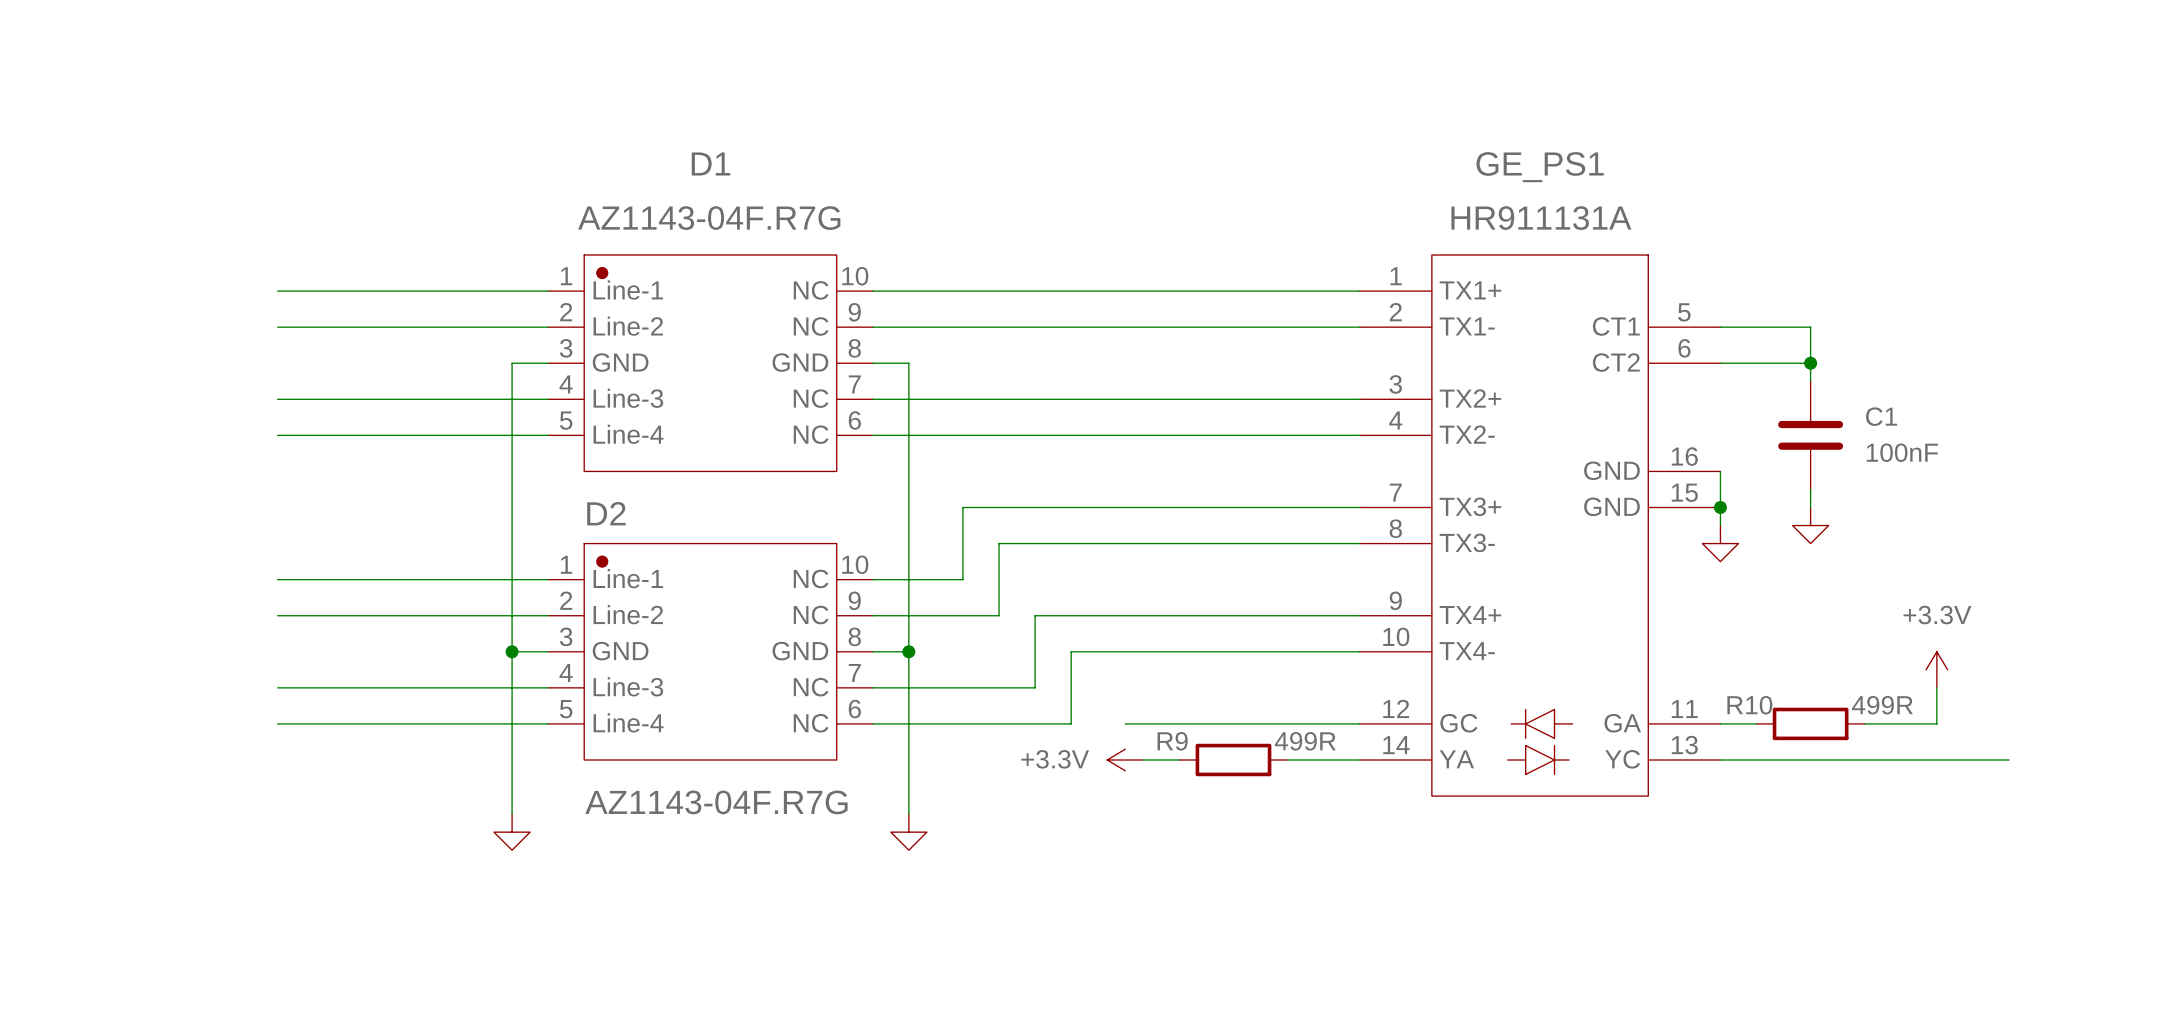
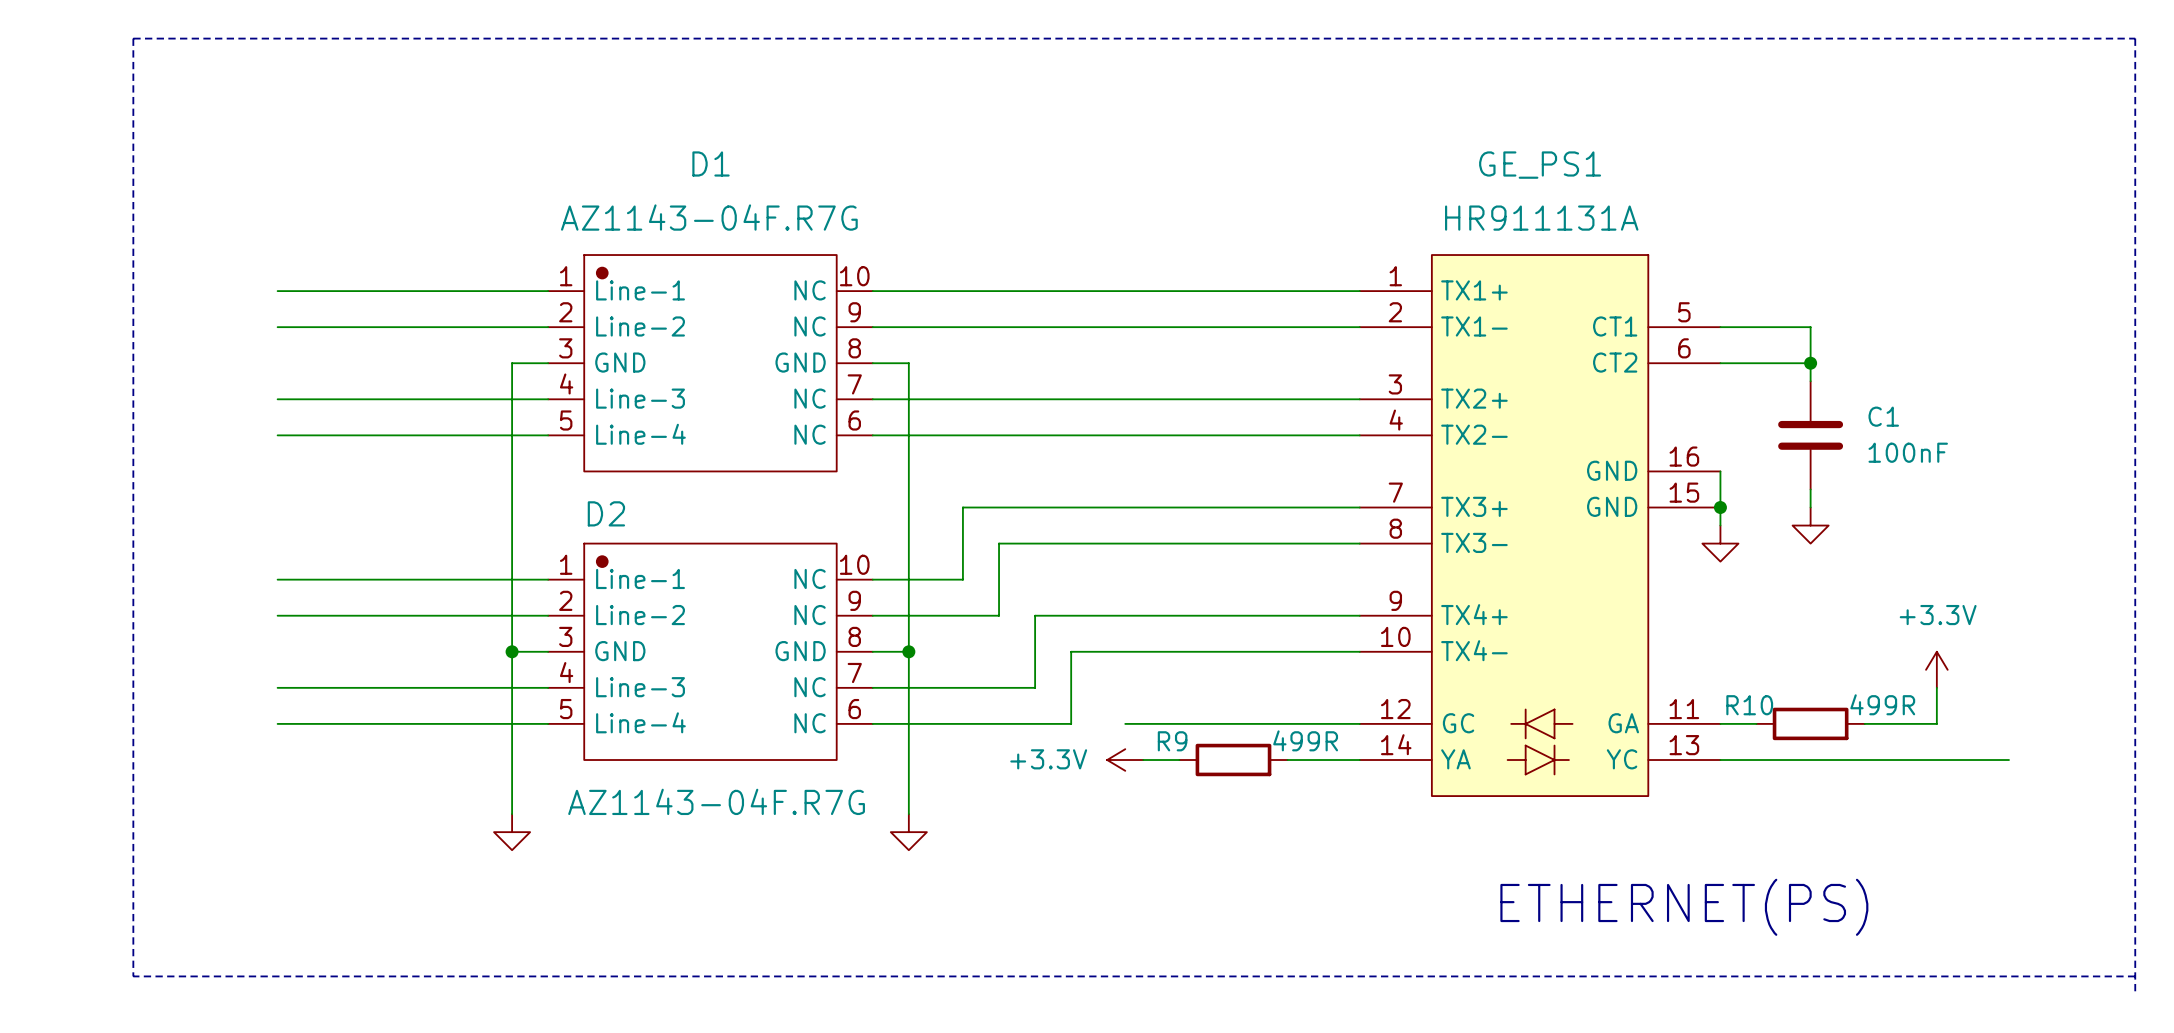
text: none -> ETHERNET(PS) (1684, 907)
line: none -> (2135, 976) (133, 976) (133, 38) (2135, 38) (2135, 994)

